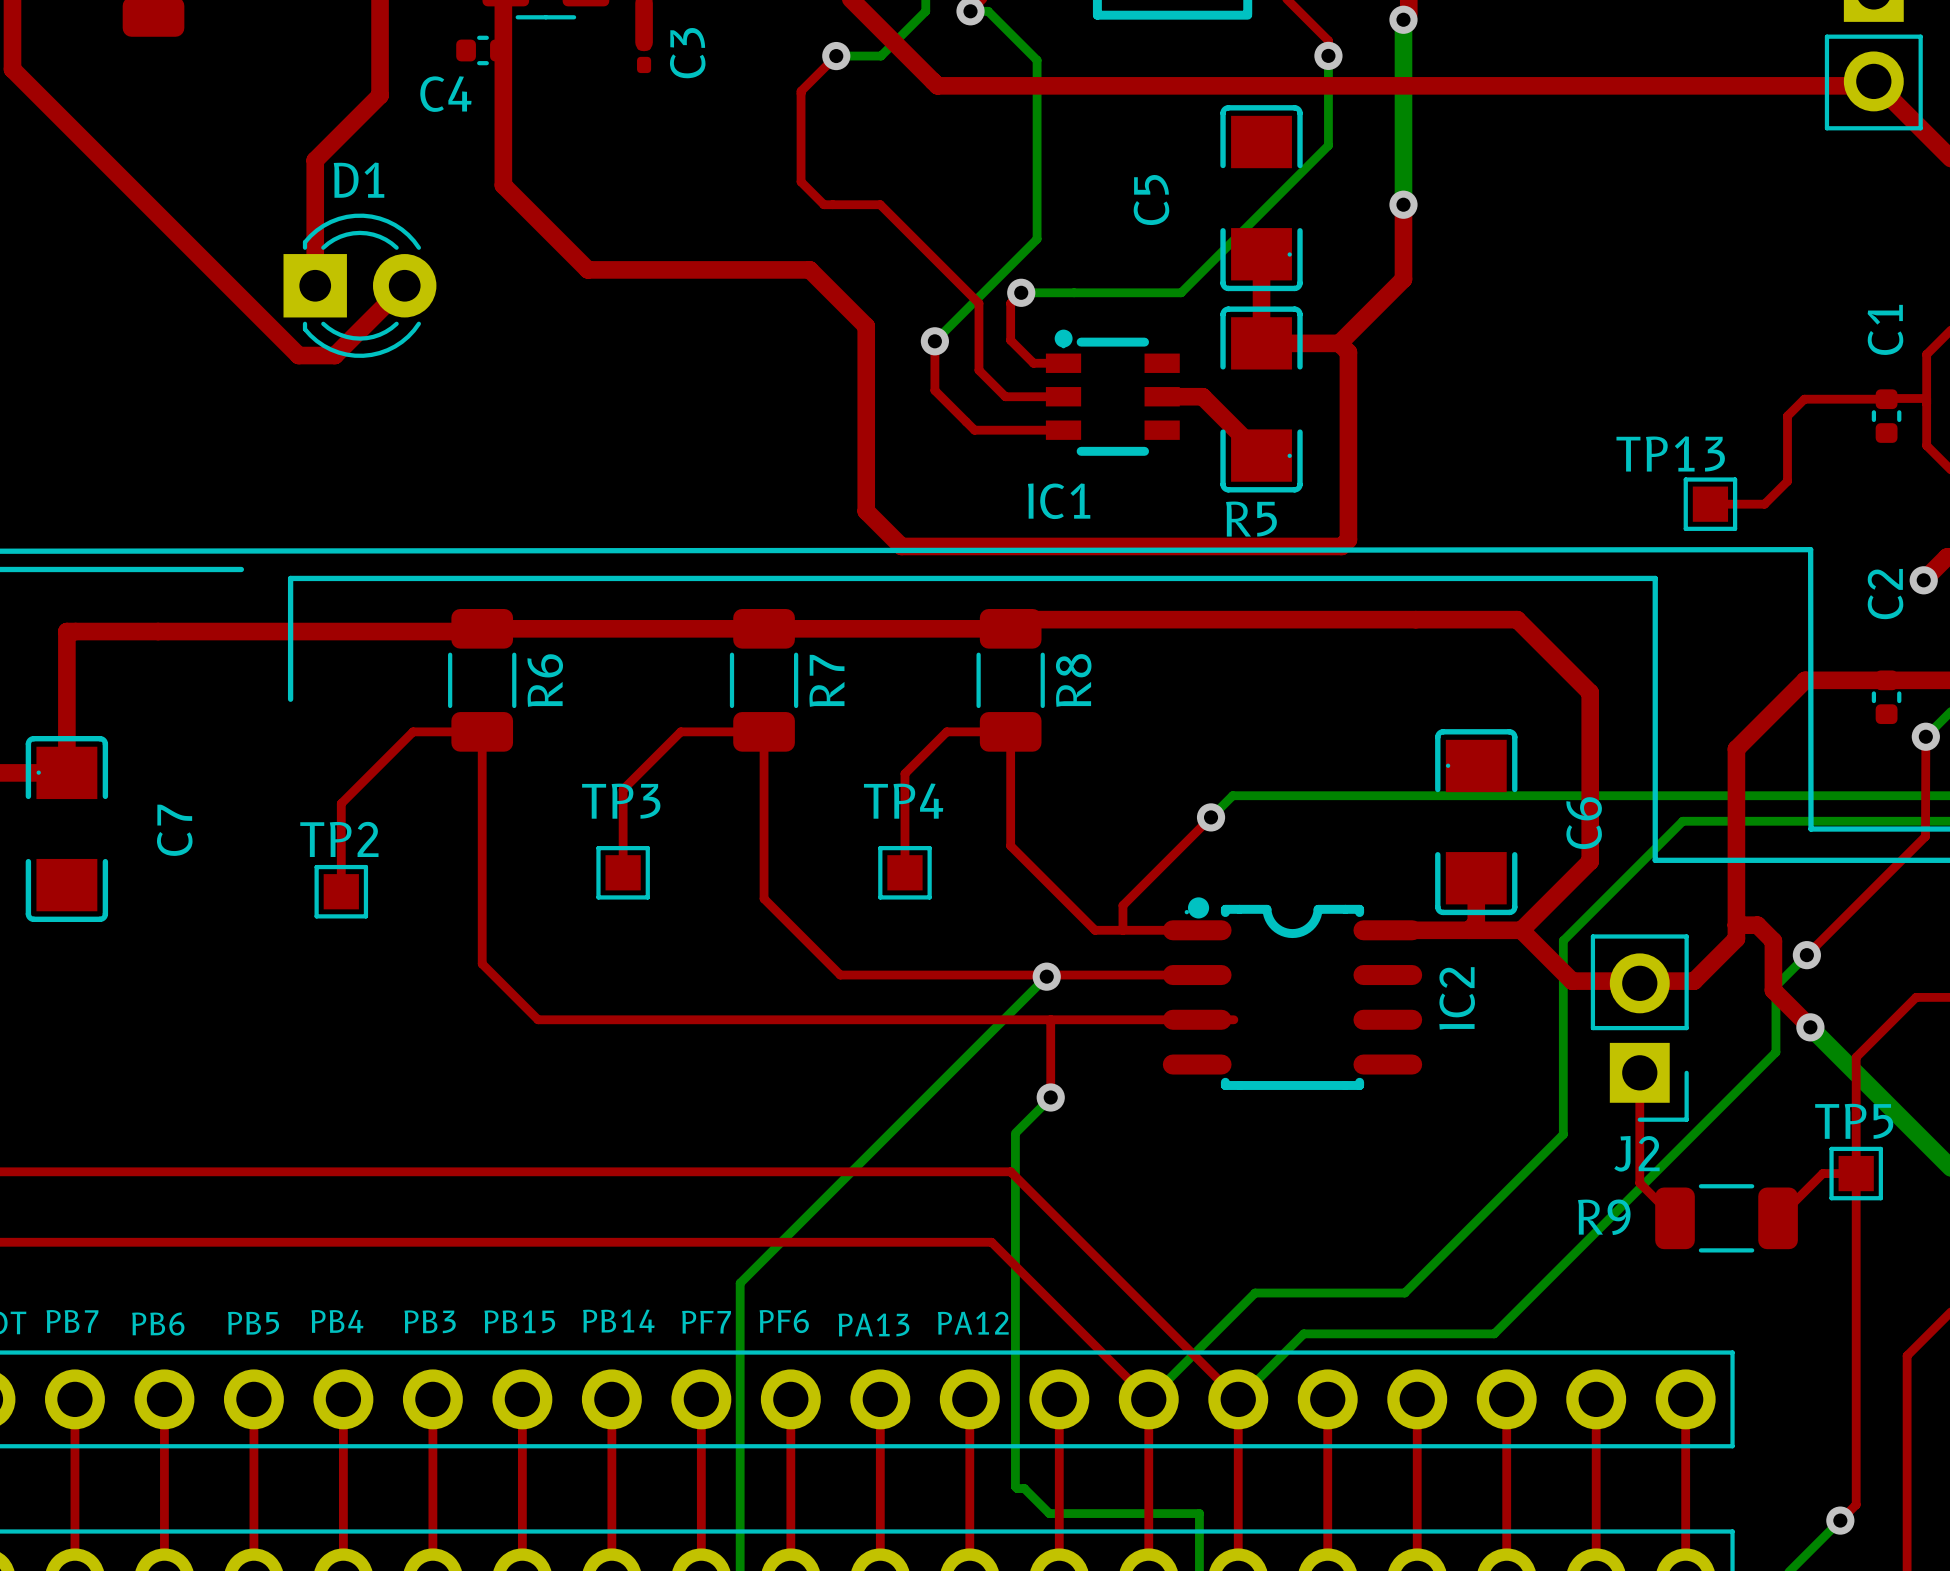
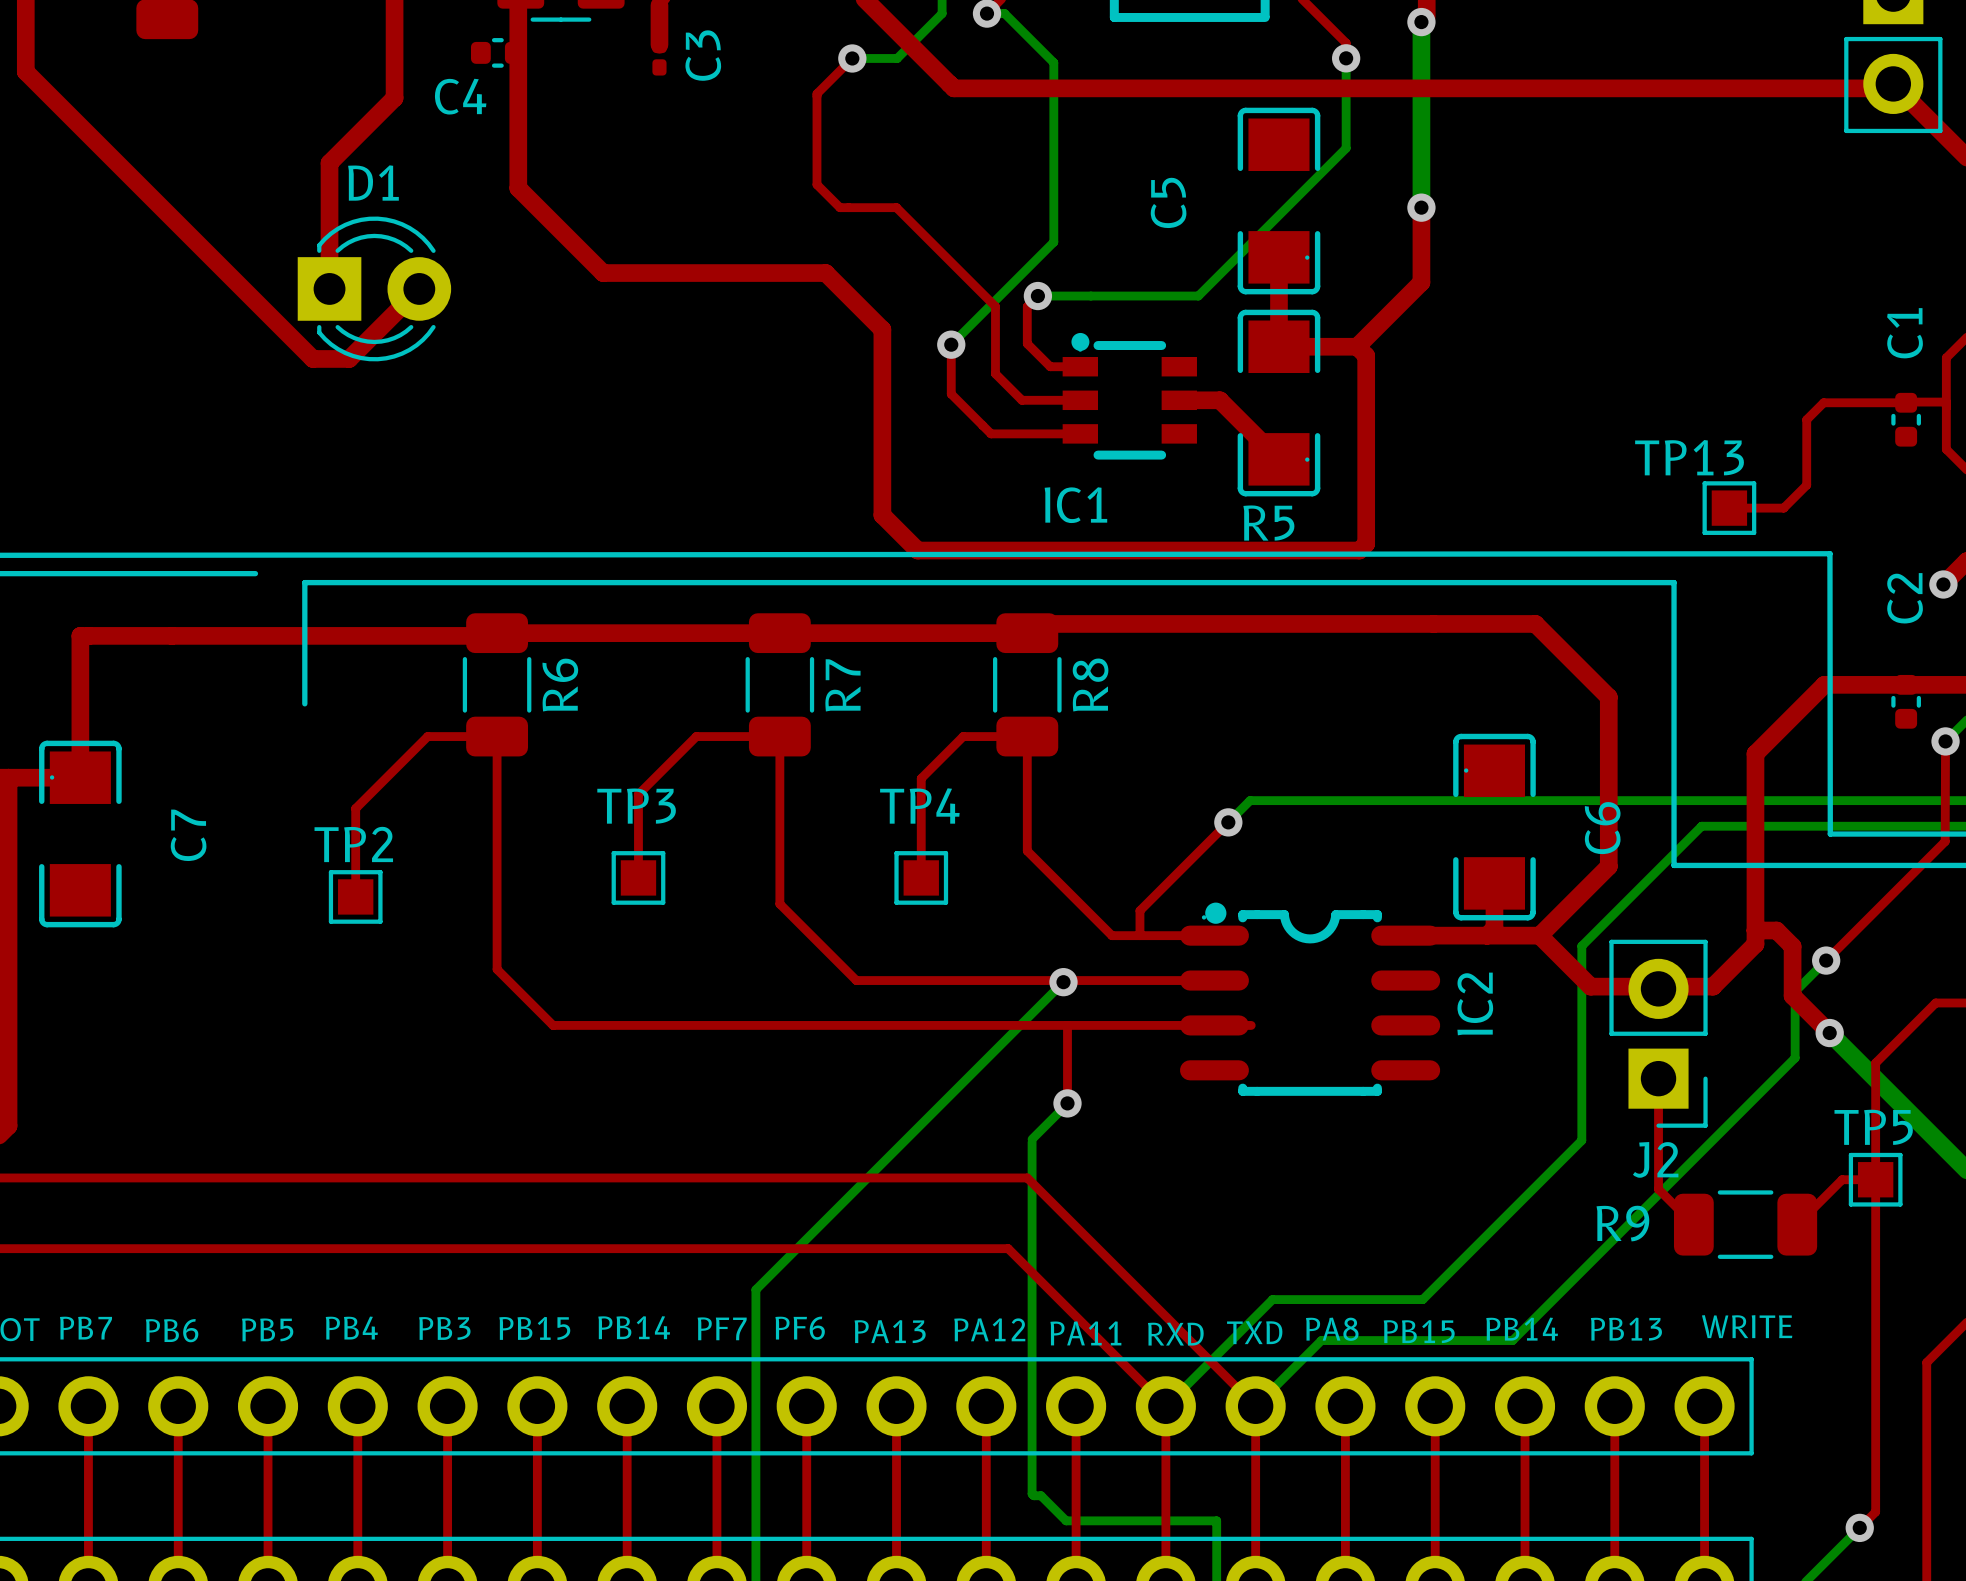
text: none -> WRITE (1747, 1326)
text: none -> PA8 (1332, 1329)
text: none -> PB14 (1522, 1329)
text: none -> PB13 (1626, 1329)
text: none -> PB15 (1419, 1331)
text: none -> TXD (1254, 1332)
text: none -> PA11 (1085, 1333)
text: none -> RXD (1175, 1334)

